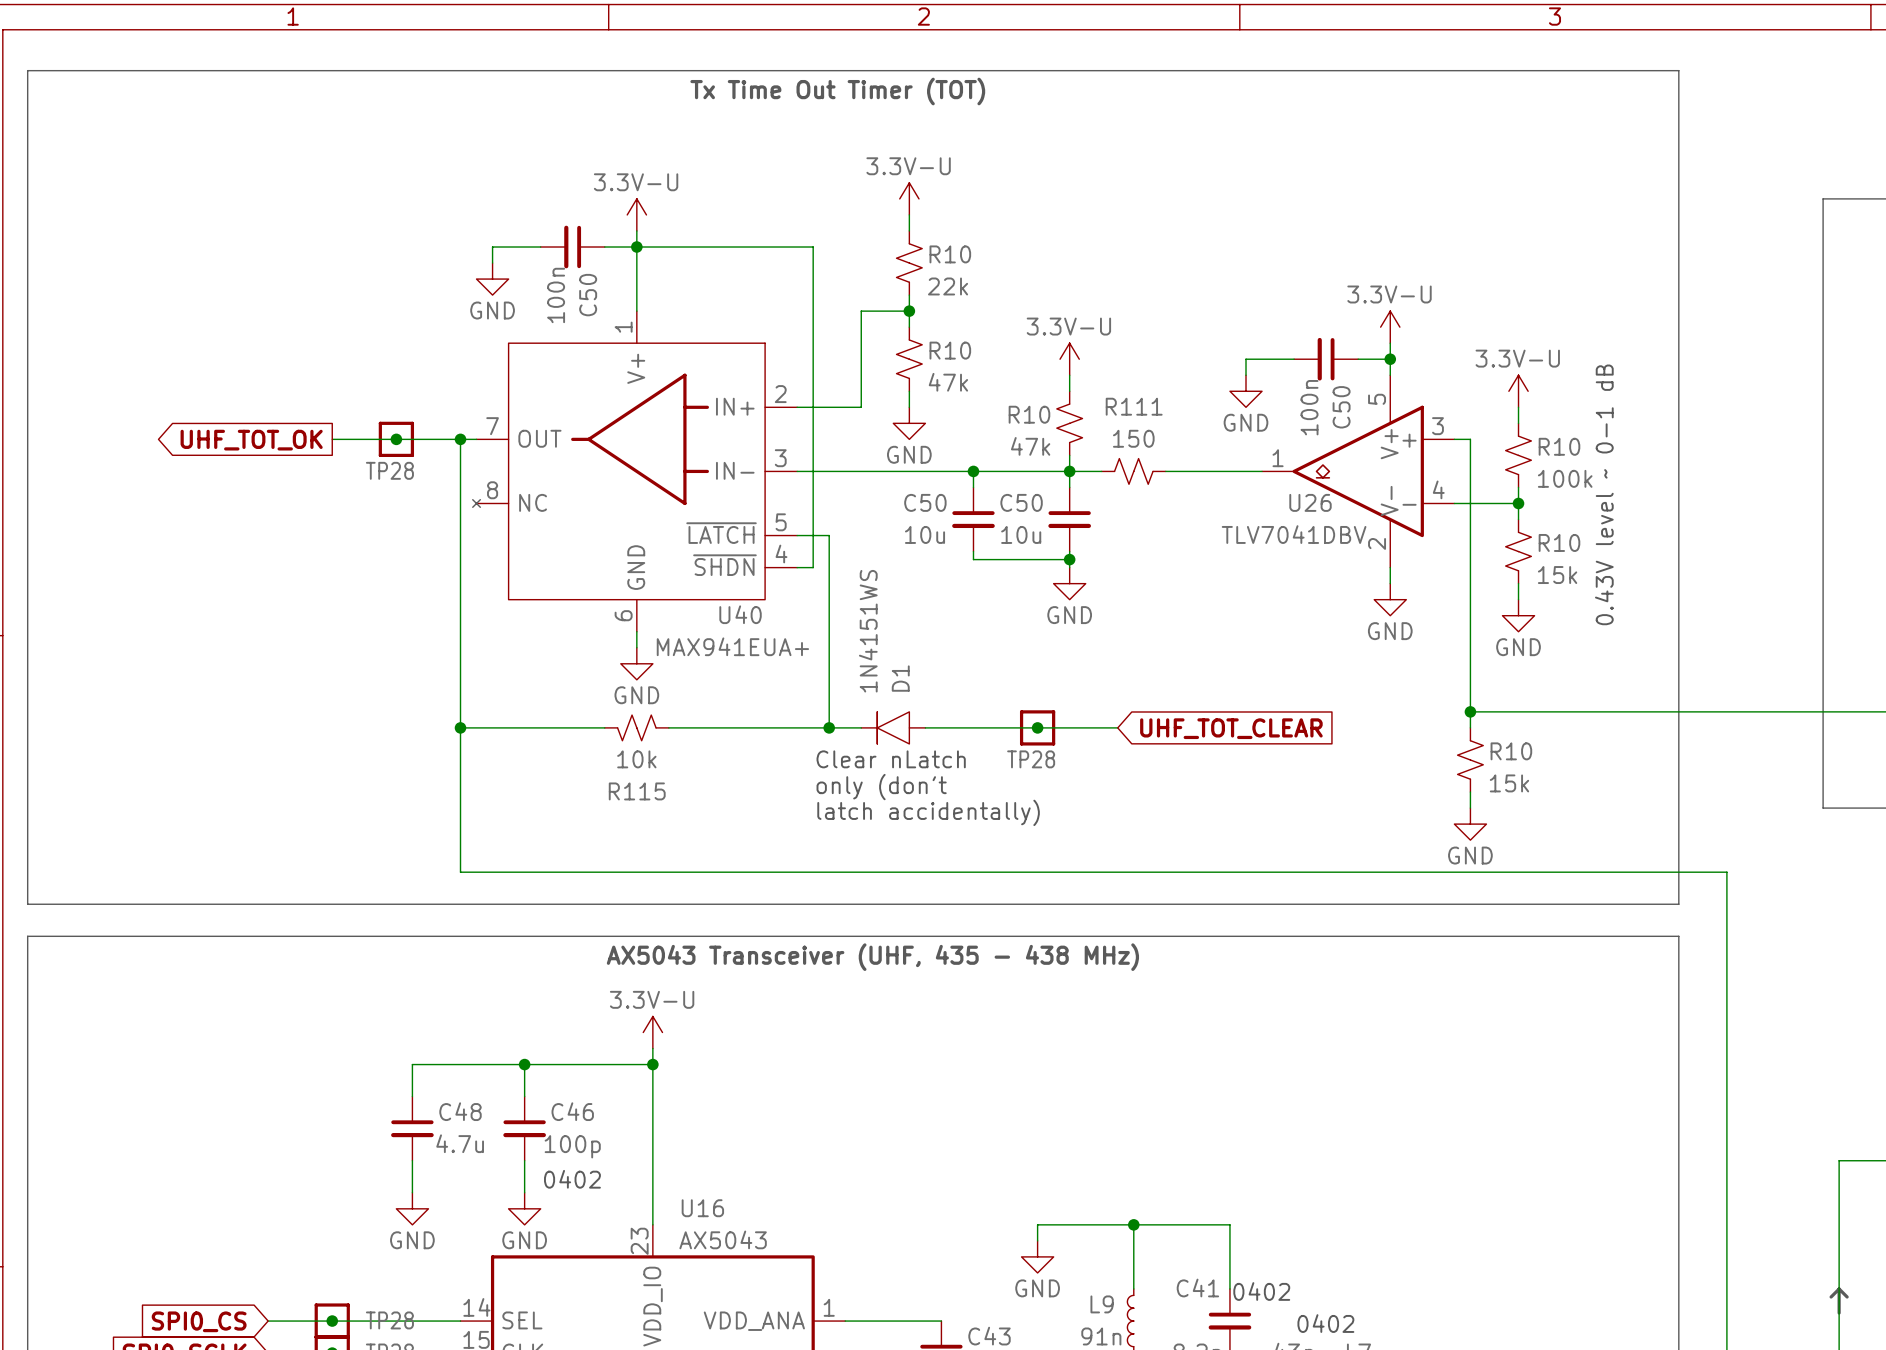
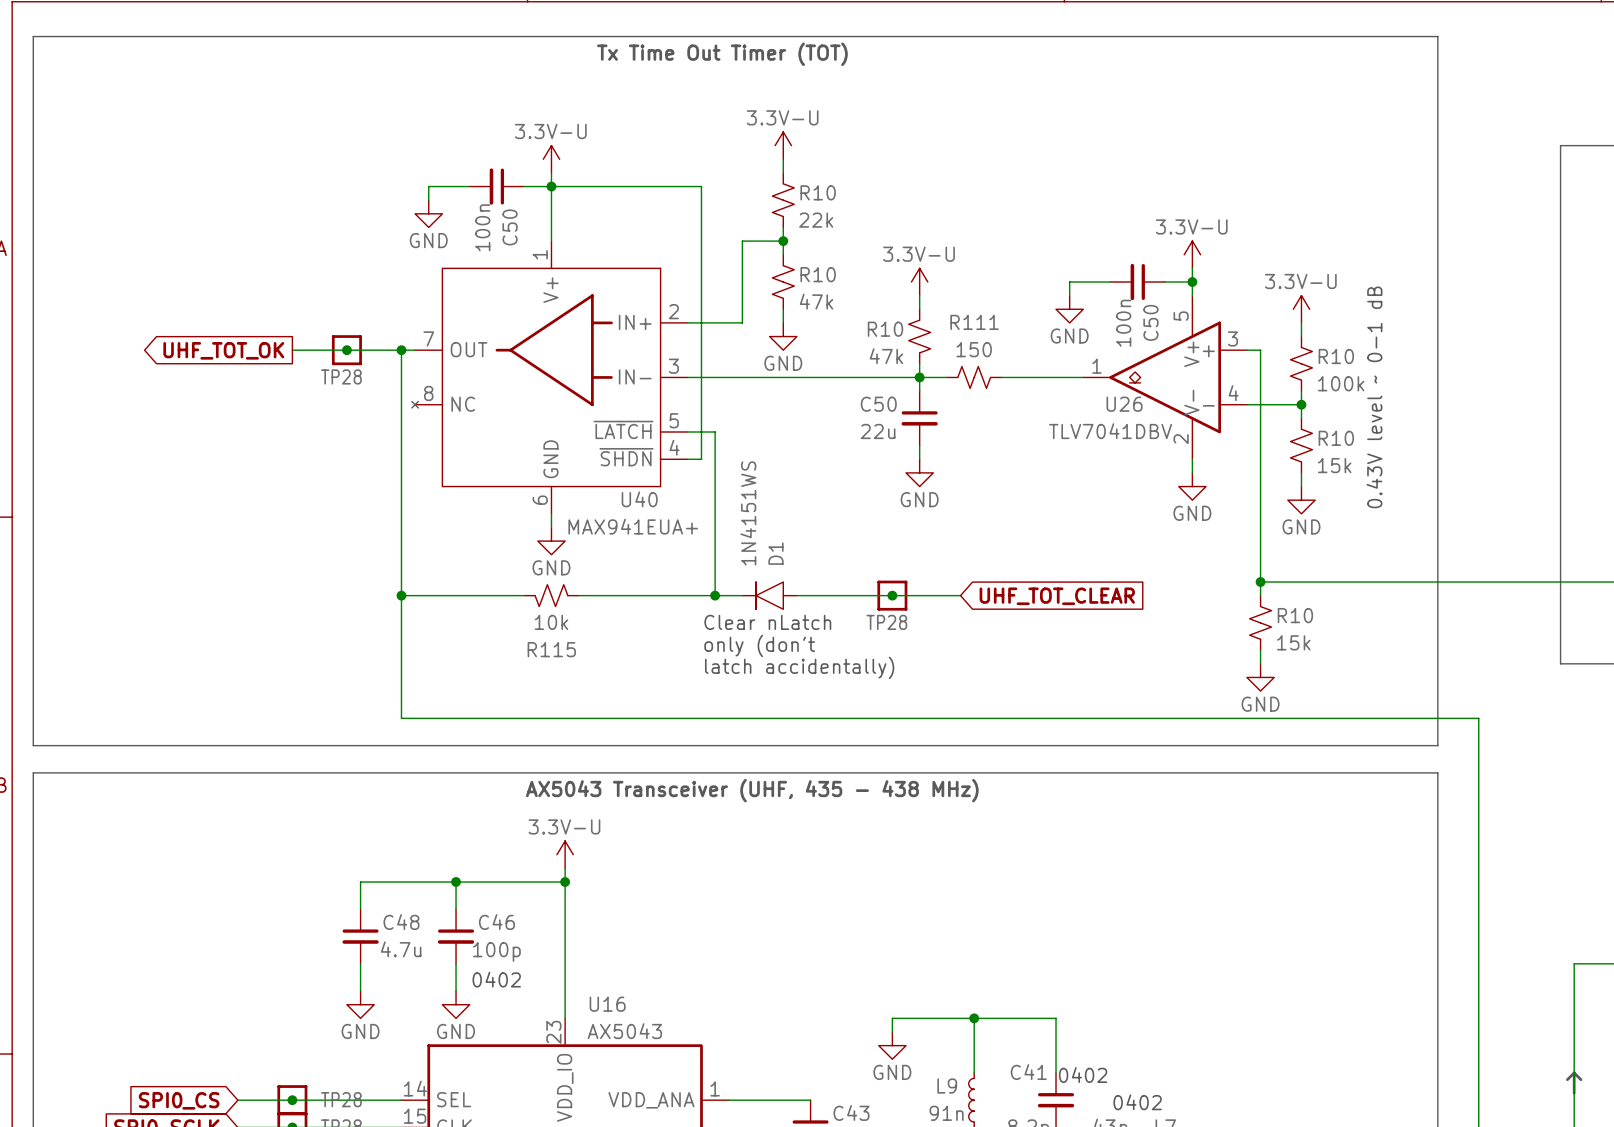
wire: (973, 471) (973, 487) -> none
junction: (973, 471) -> none
C50: 10u (973, 519) -> none
C50 value: 10u (1021, 534) -> 22u (878, 431)
wire: (973, 551) (973, 559) (1069, 559) -> none
junction: (1069, 559) -> none

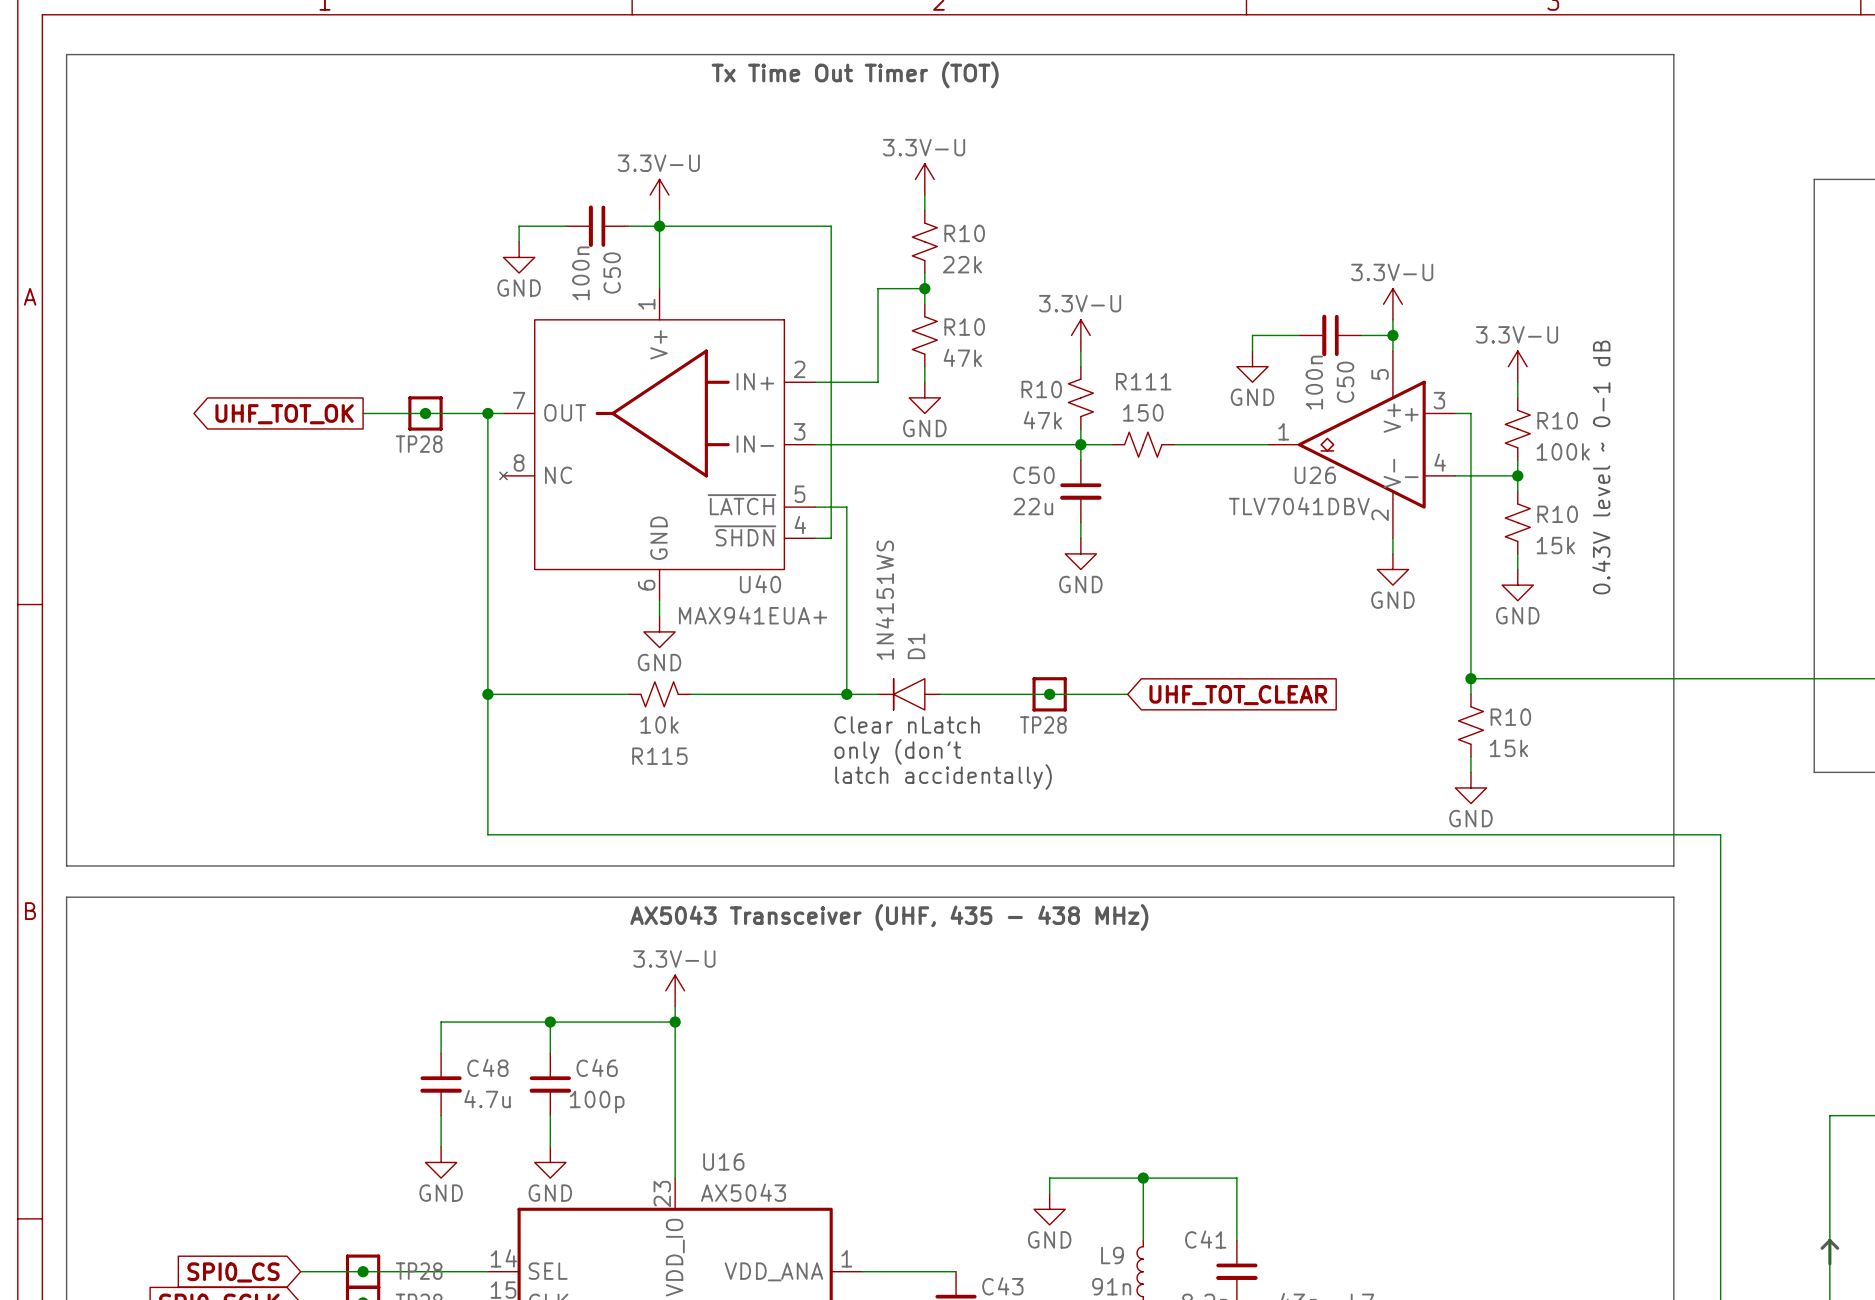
text: 0402 (496, 979) -> none
text: 0402 (1083, 1075) -> none
text: 0402 (1137, 1102) -> none

